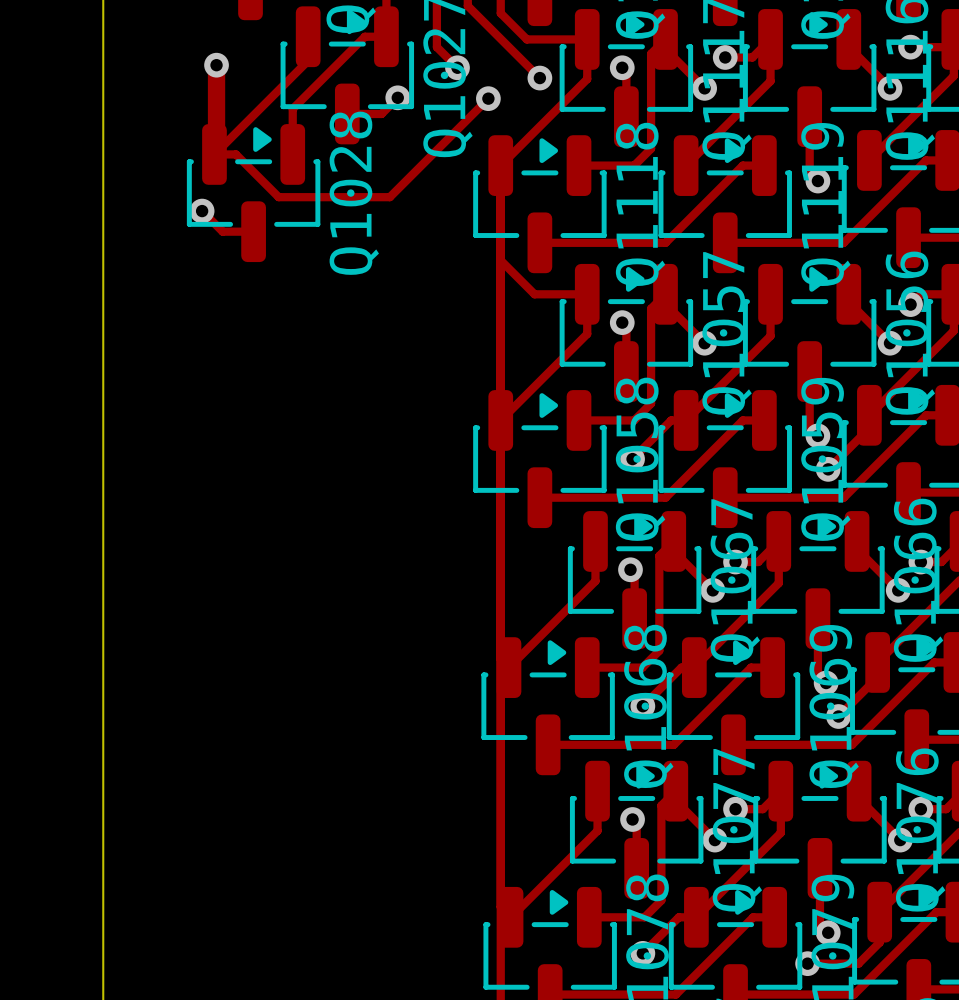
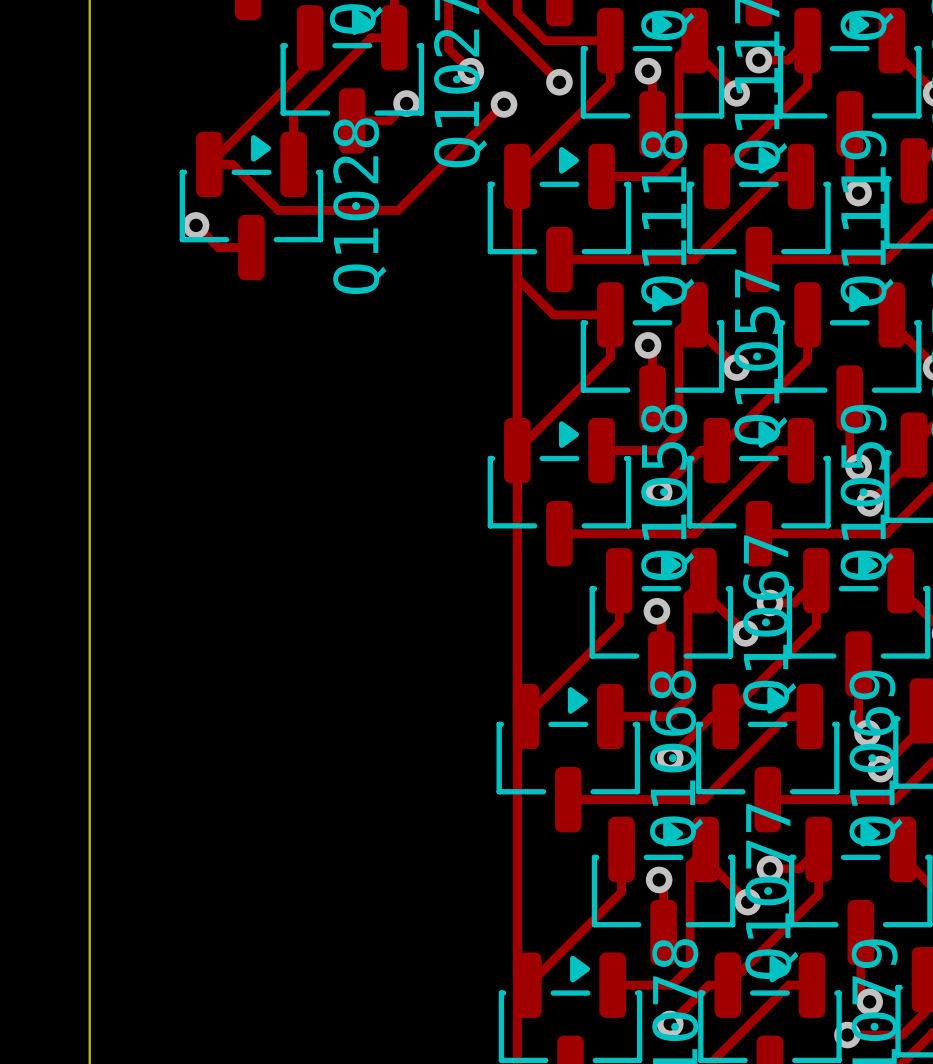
track: (216, 65) (216, 152) (214, 154) -> none
via: (216, 65) -> none

